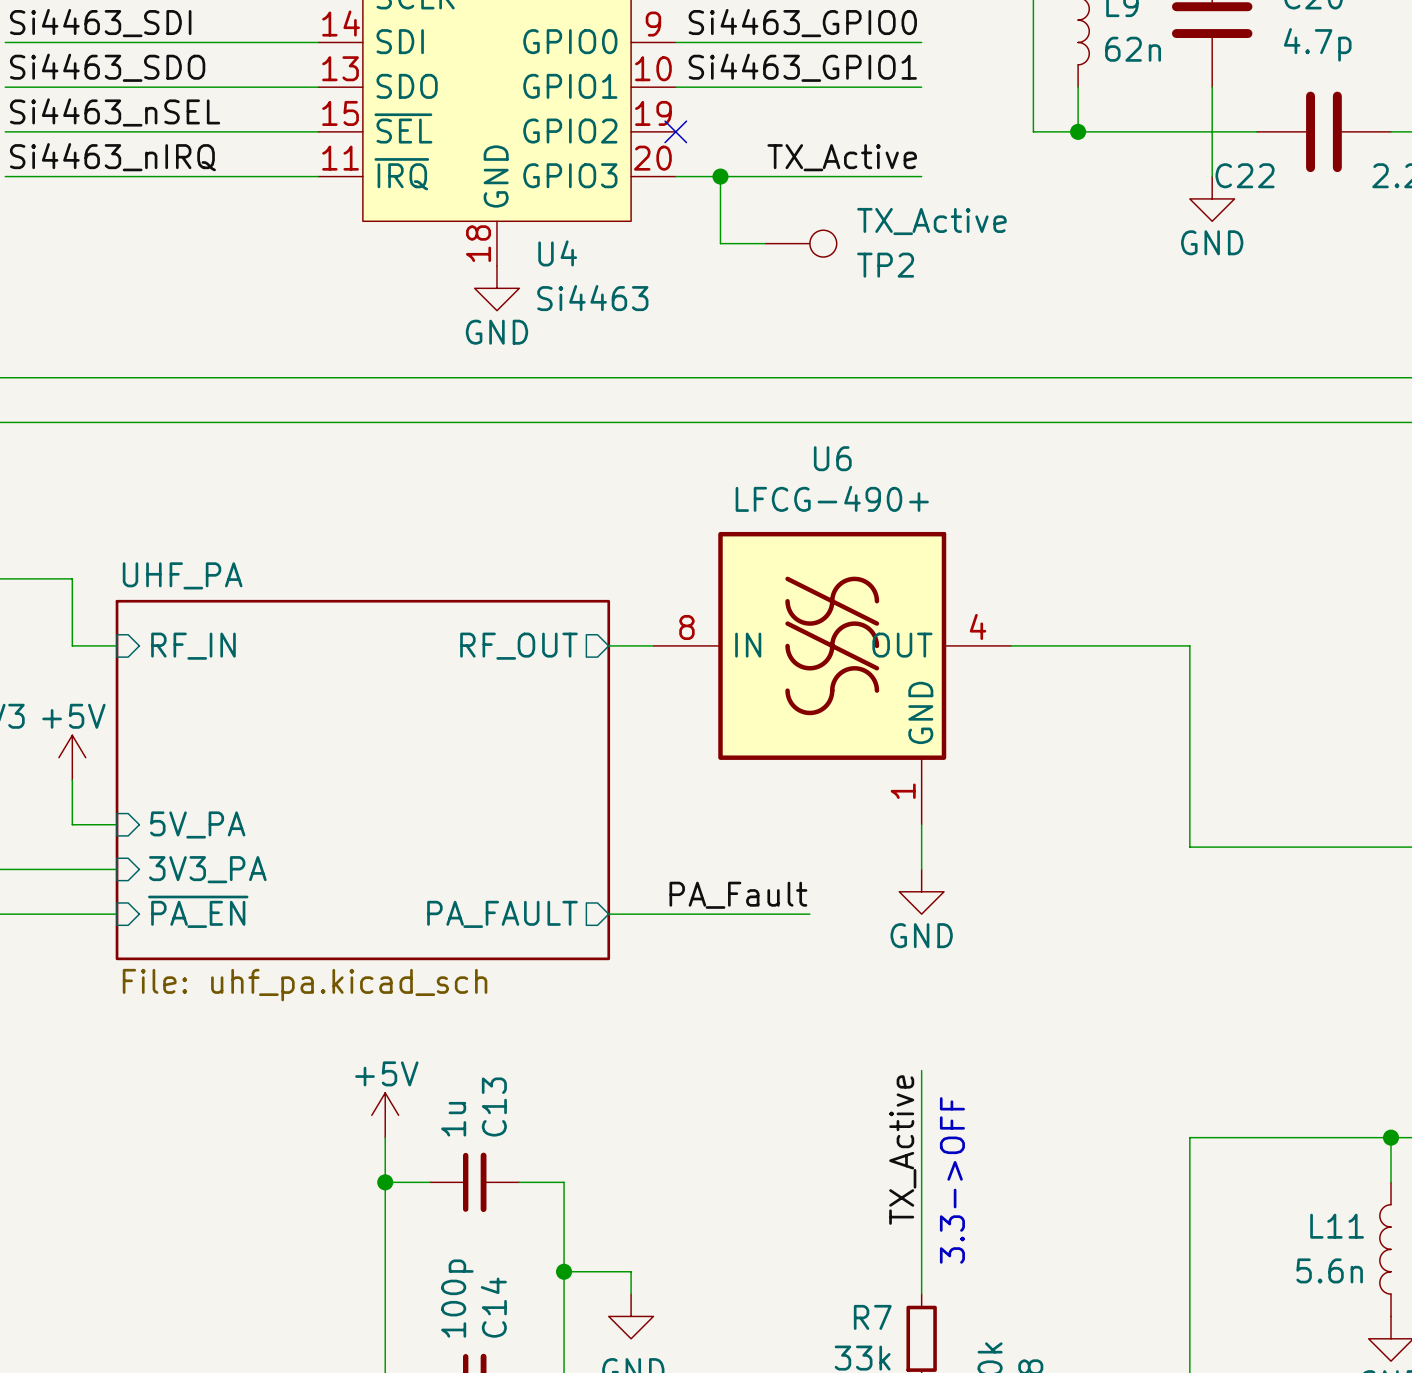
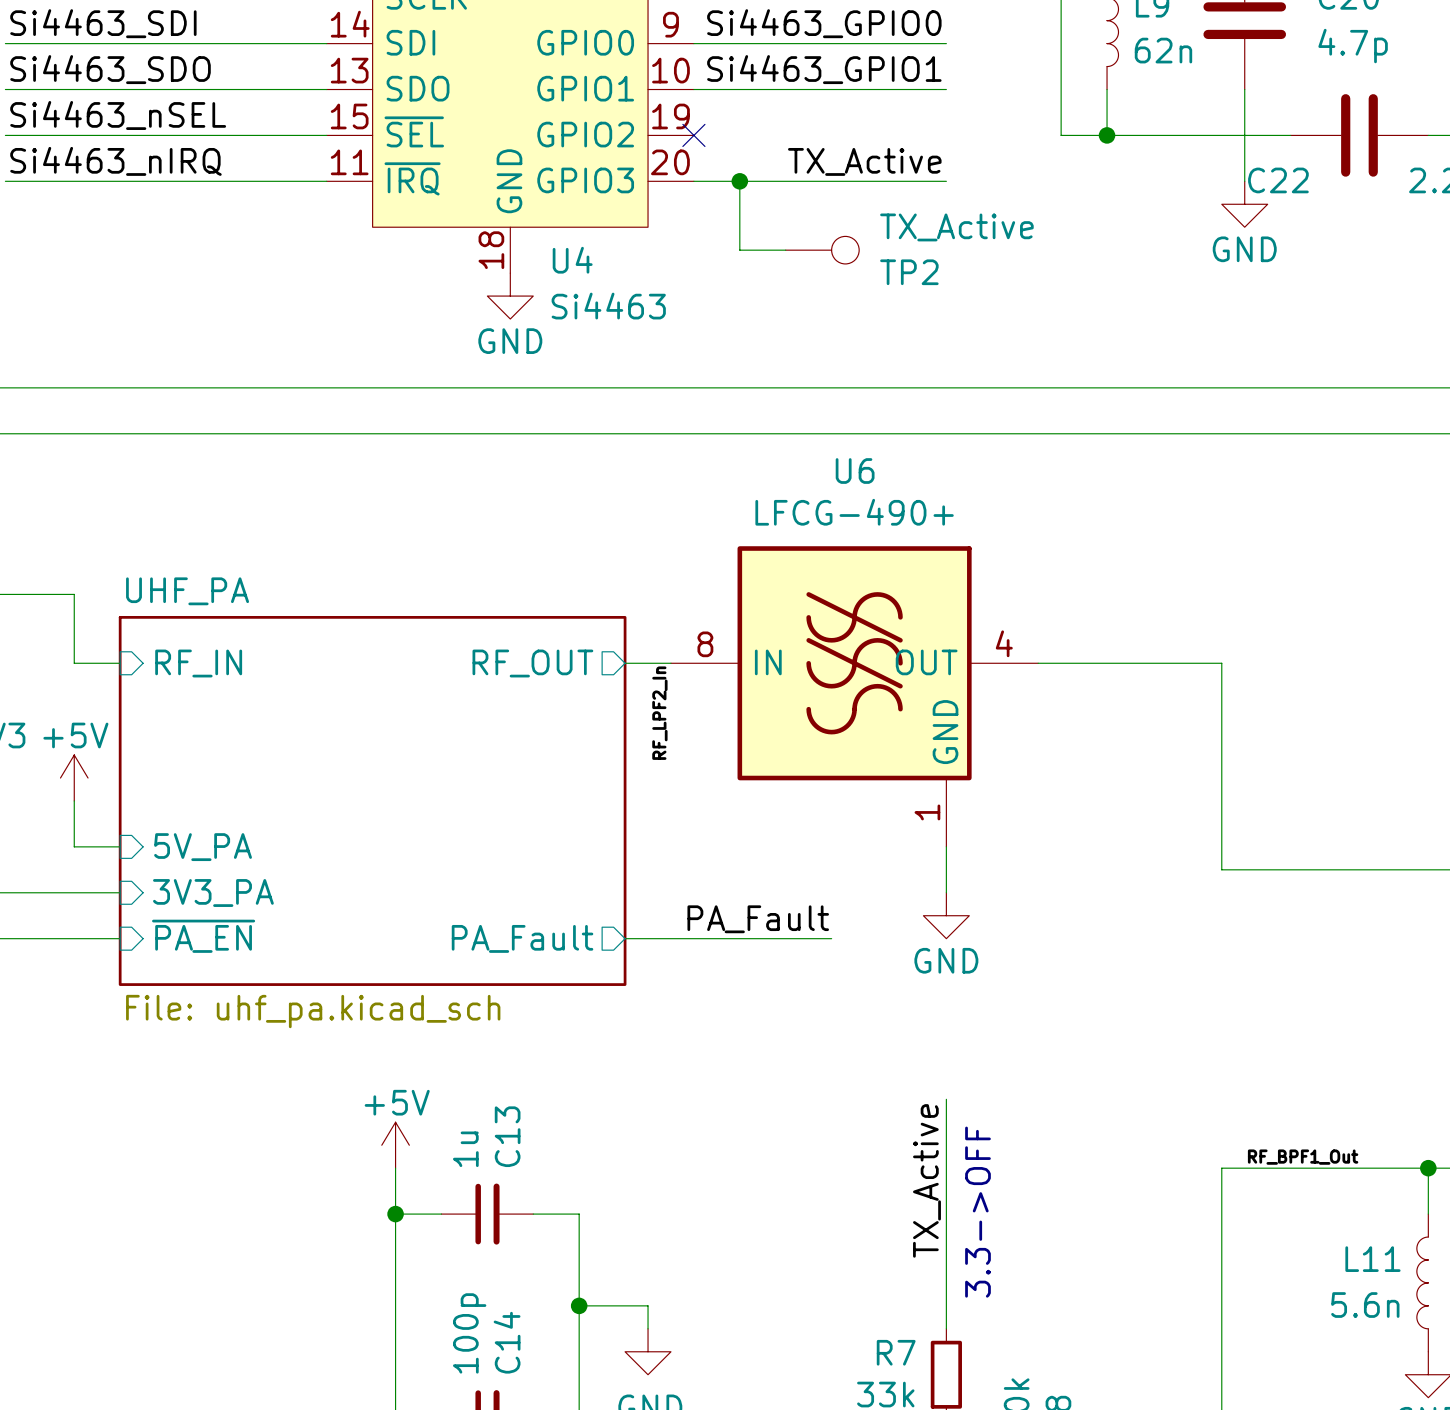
label: none -> RF_LPF2_In (659, 713)
sheet pin: PA_FAULT (502, 914) -> PA_Fault (522, 938)
label: none -> RF_BPF1_Out (1303, 1157)

